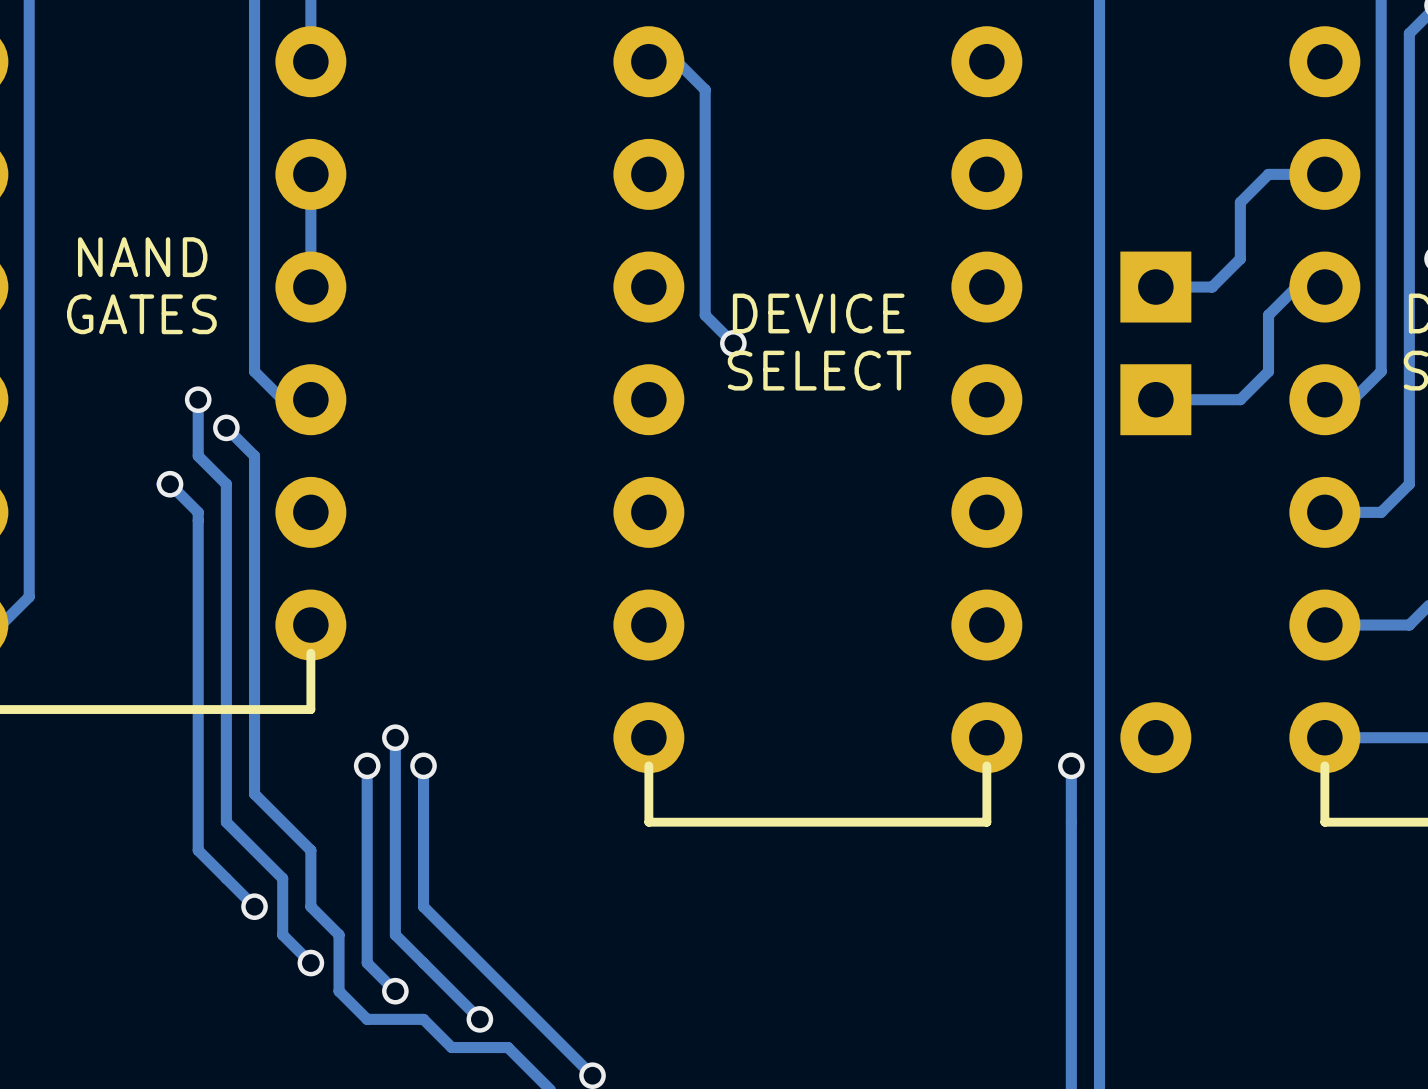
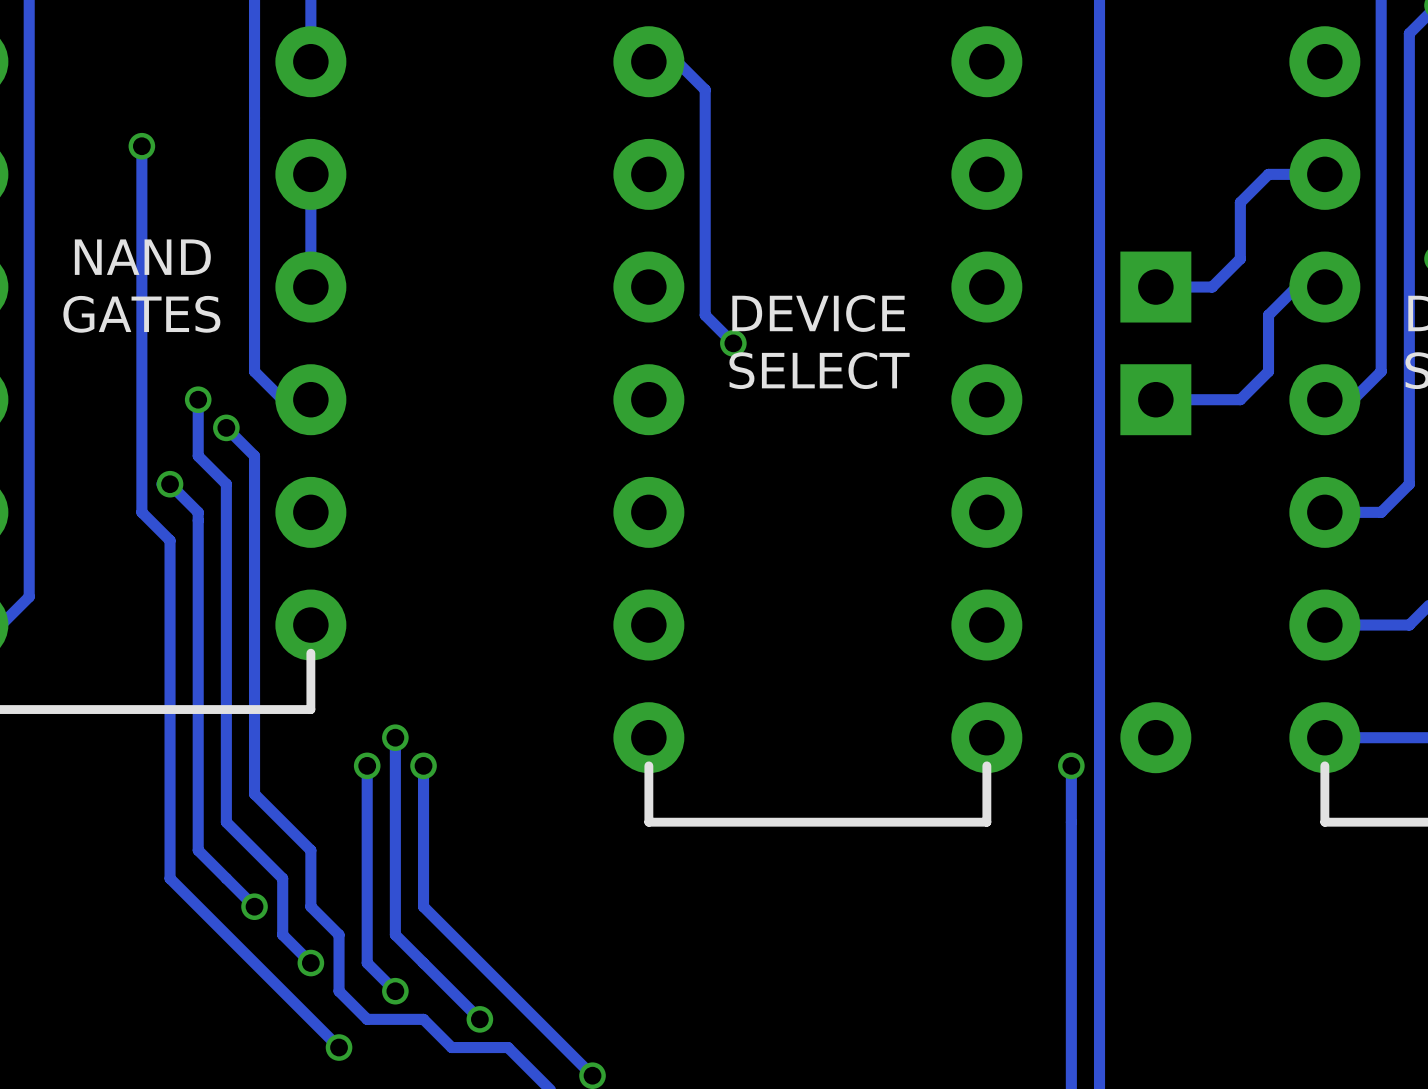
track: none -> (141, 146) (141, 512) (170, 540) (170, 878) (339, 1047)
via: none -> (141, 146)
via: none -> (339, 1047)

